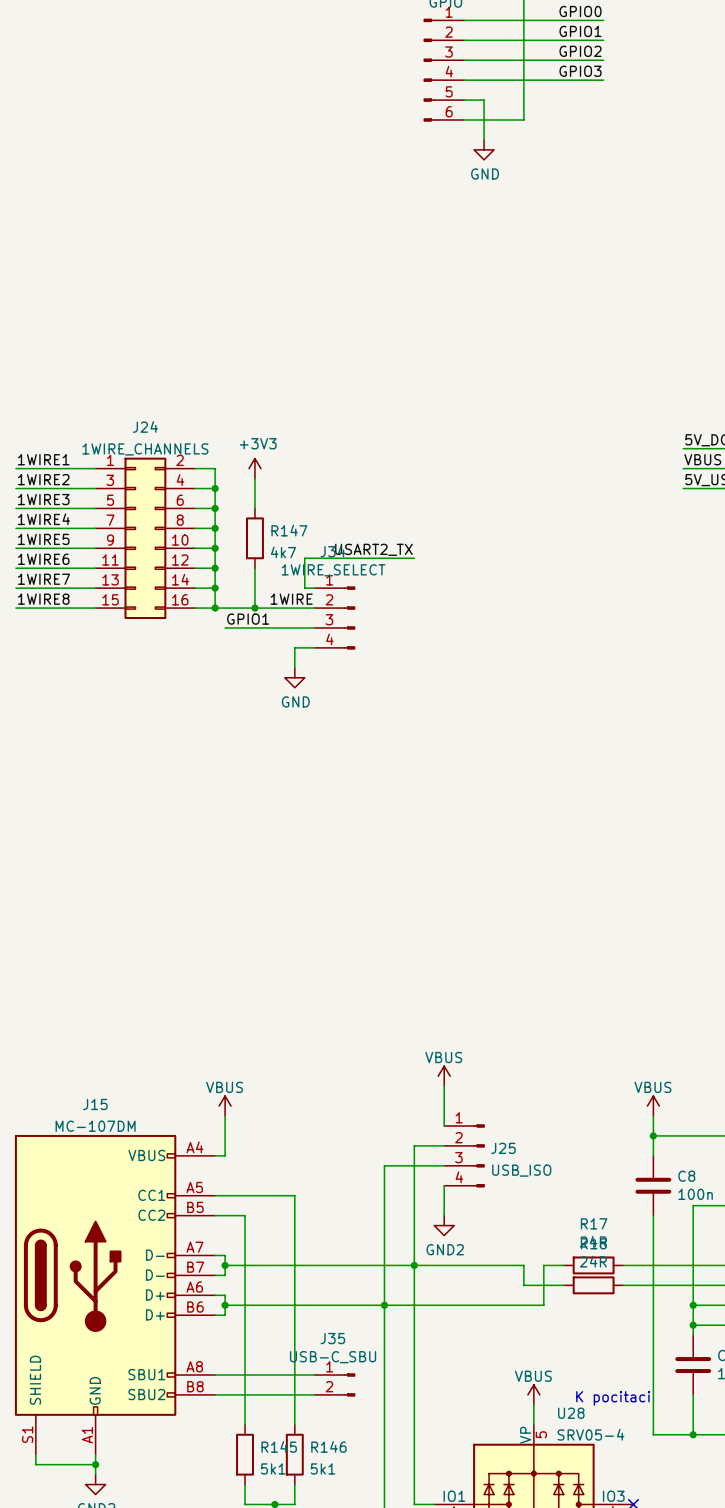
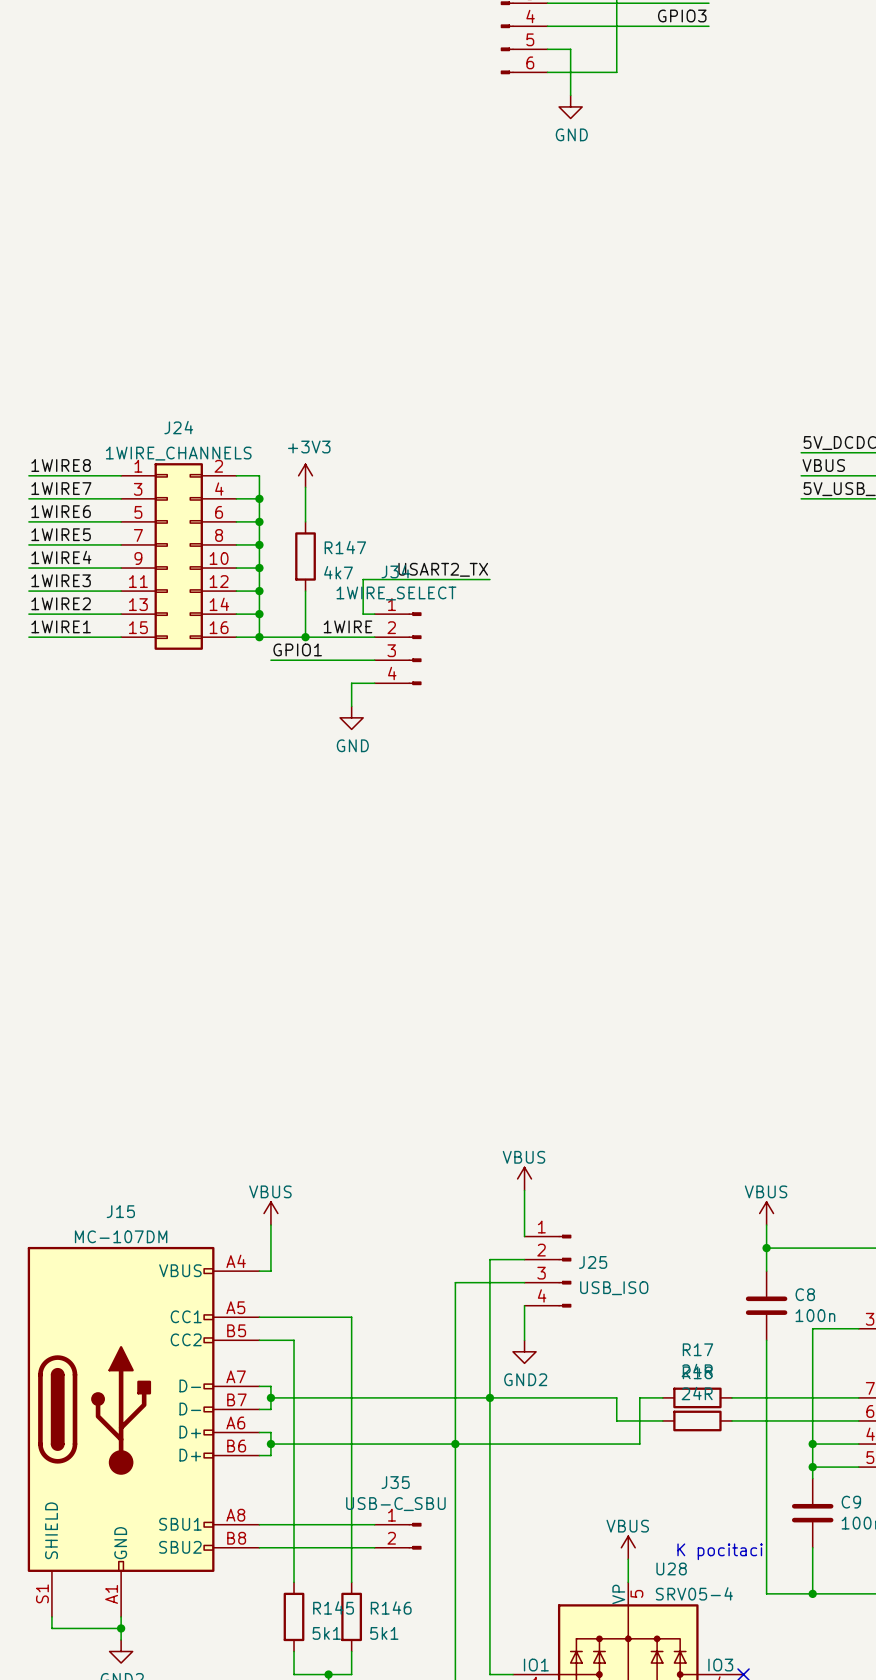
label: 1WIRE1 (43, 459) -> 1WIRE8 (61, 465)
label: 1WIRE2 (43, 479) -> 1WIRE7 (61, 488)
label: 1WIRE3 (43, 499) -> 1WIRE6 (61, 511)
label: 1WIRE4 (43, 519) -> 1WIRE5 (61, 534)
label: 1WIRE5 (43, 539) -> 1WIRE4 (61, 557)
label: 1WIRE6 (43, 559) -> 1WIRE3 (61, 580)
label: 1WIRE7 (43, 579) -> 1WIRE2 (61, 603)
label: 1WIRE8 (43, 599) -> 1WIRE1 (61, 626)

